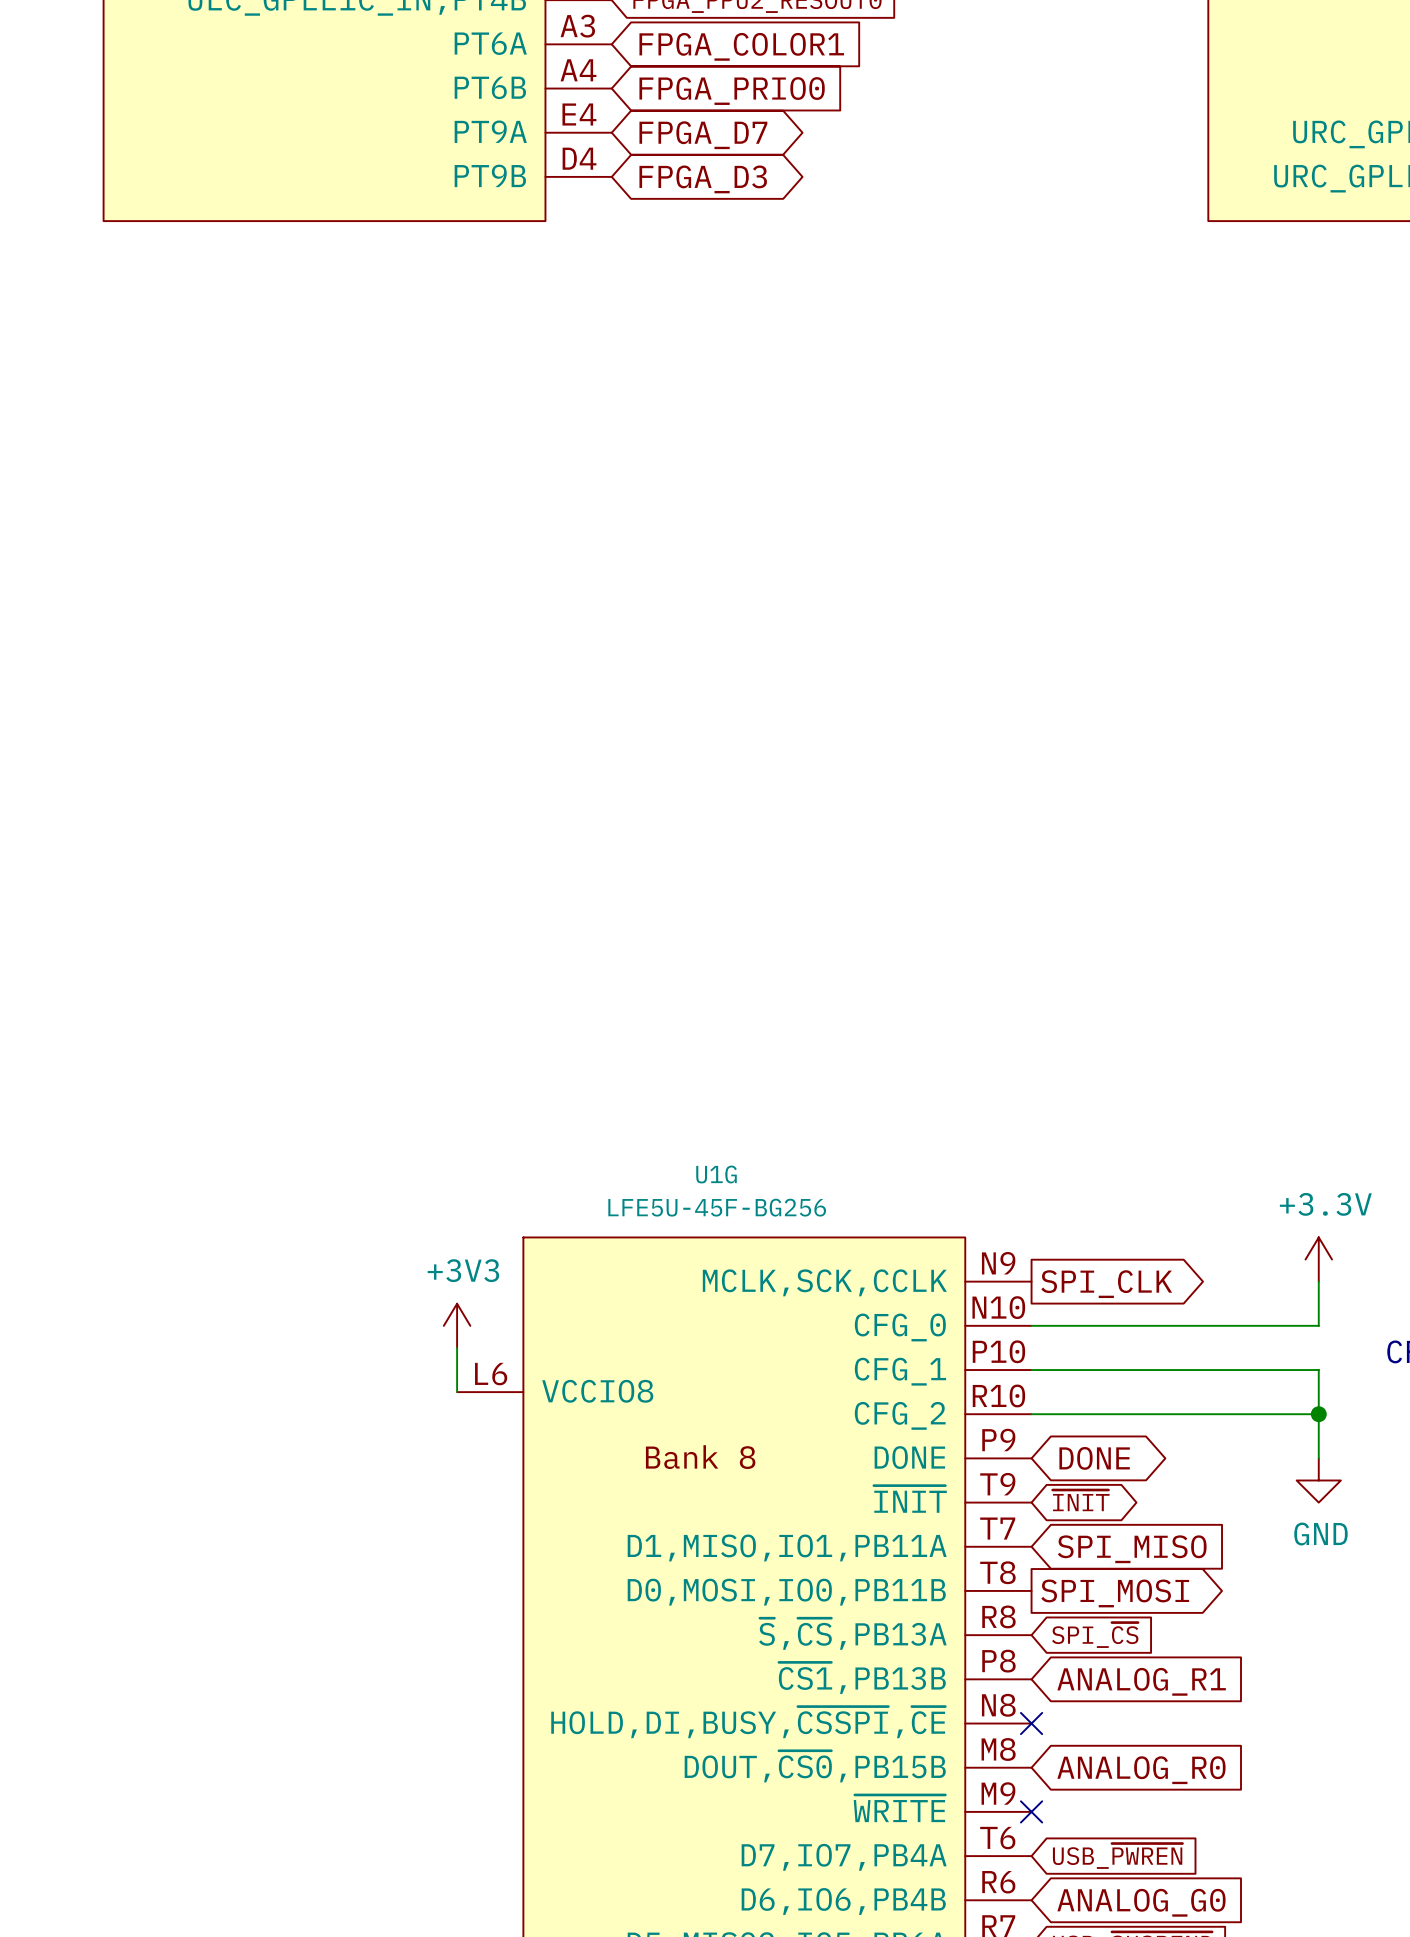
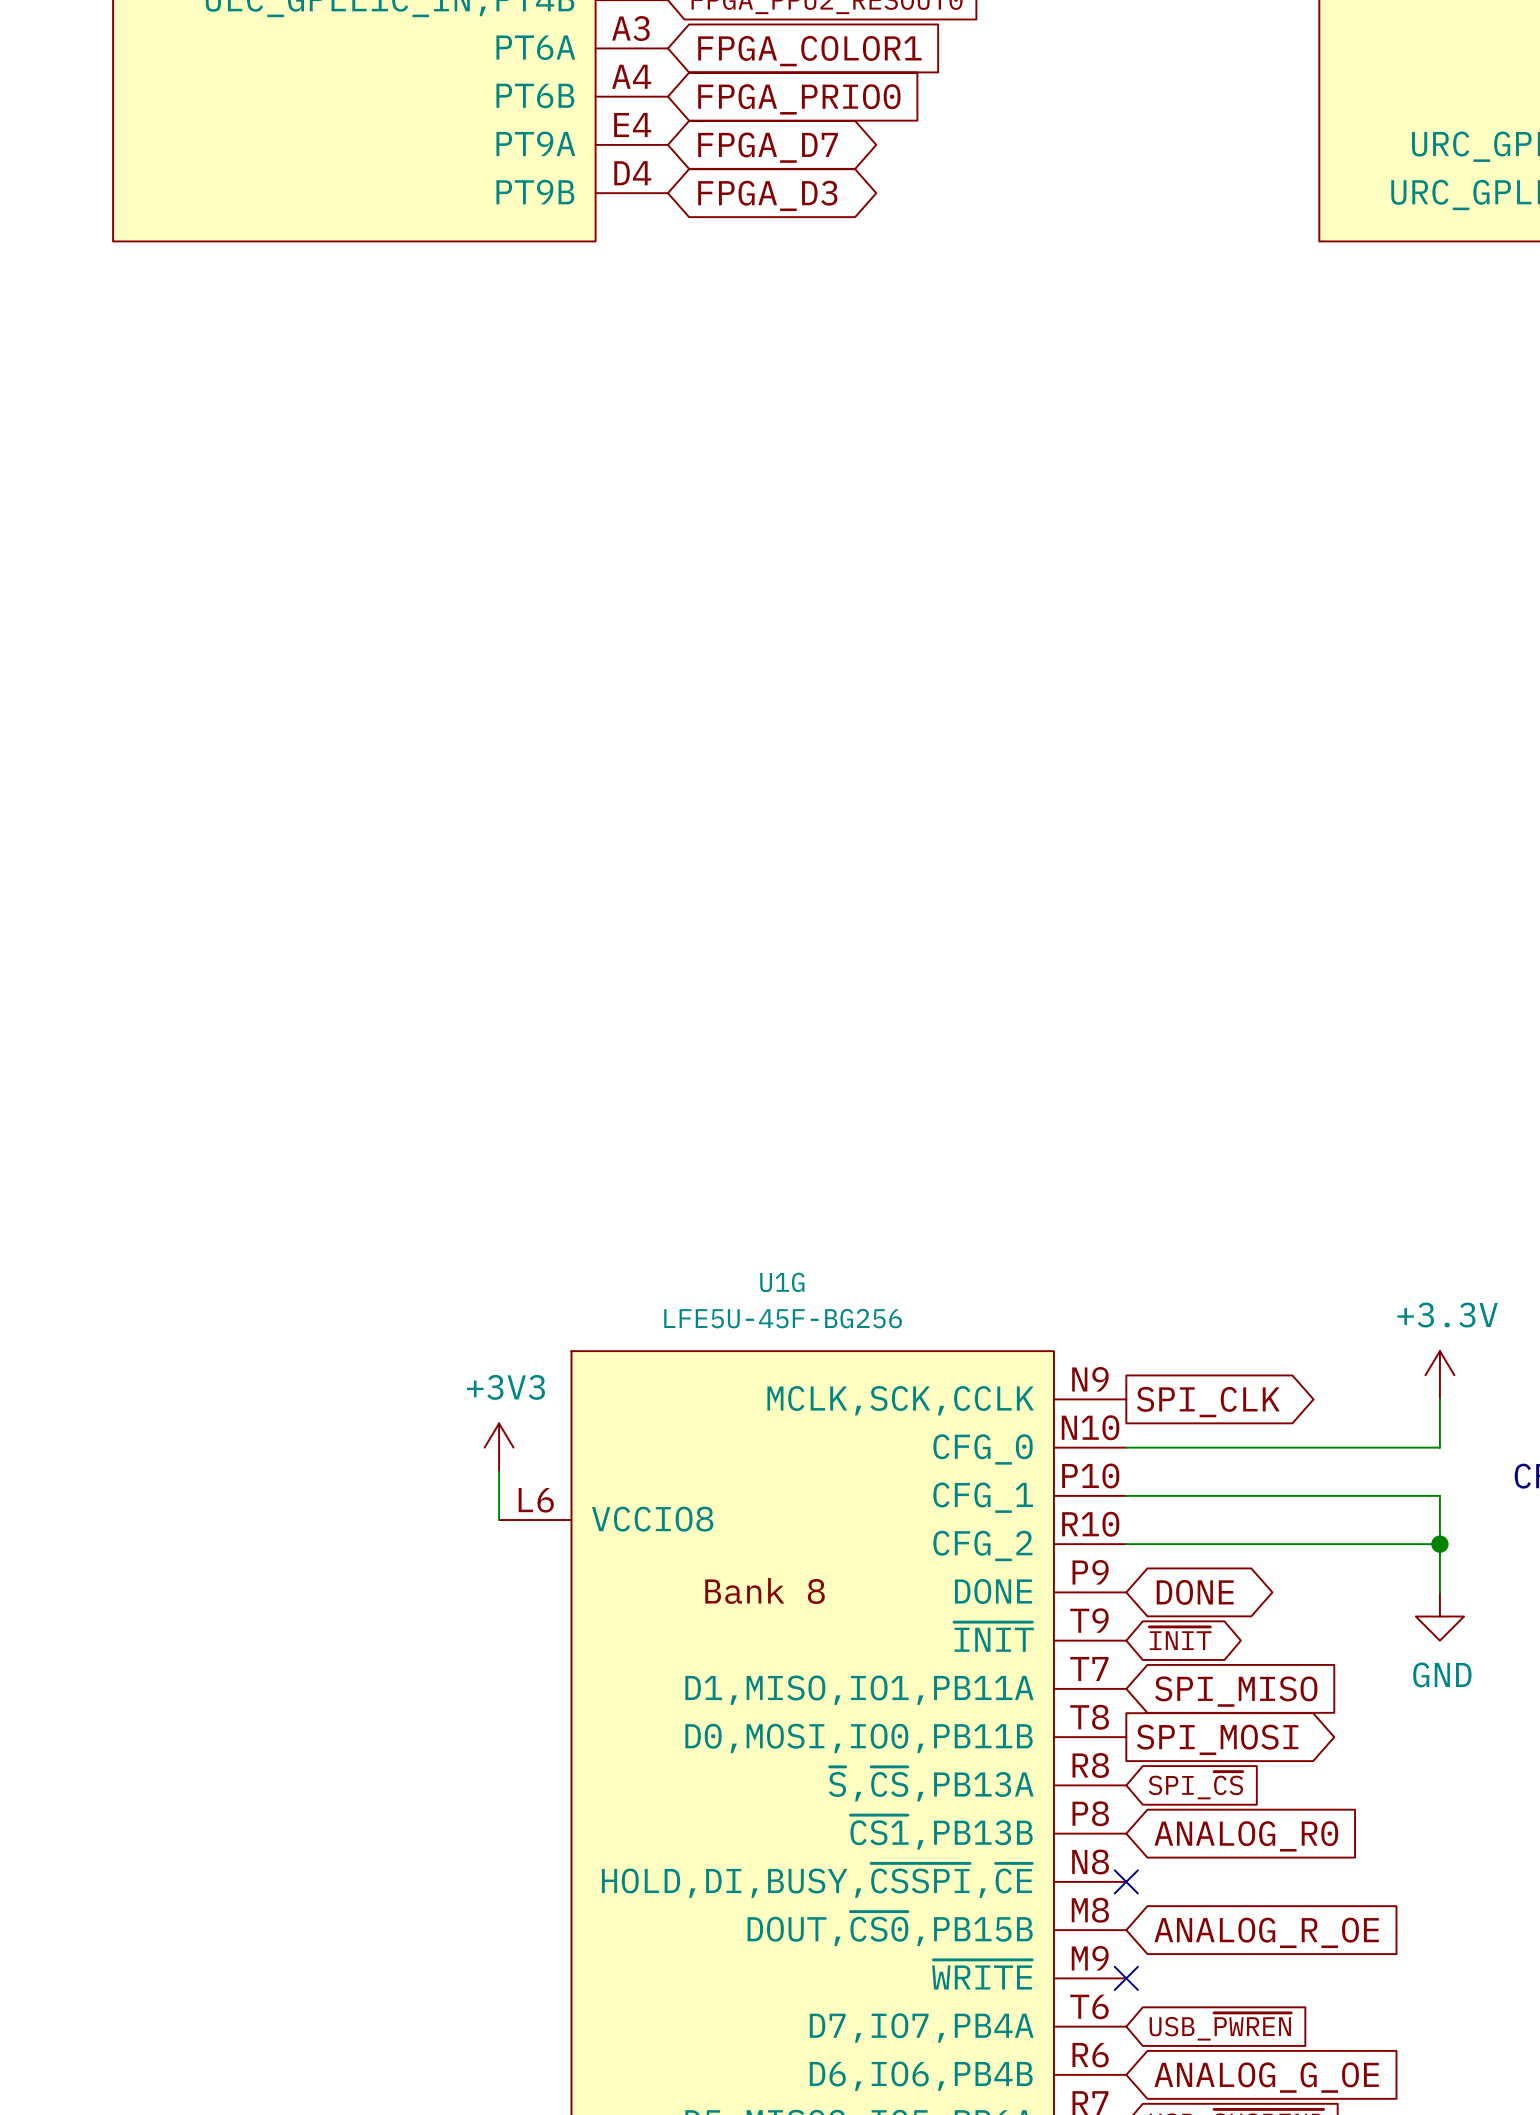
global label: ANALOG_R1 (1141, 1681) -> ANALOG_R0 (1246, 1836)
global label: ANALOG_R0 (1141, 1770) -> ANALOG_R_OE (1266, 1932)
global label: ANALOG_G0 (1141, 1902) -> ANALOG_G_OE (1266, 2077)

